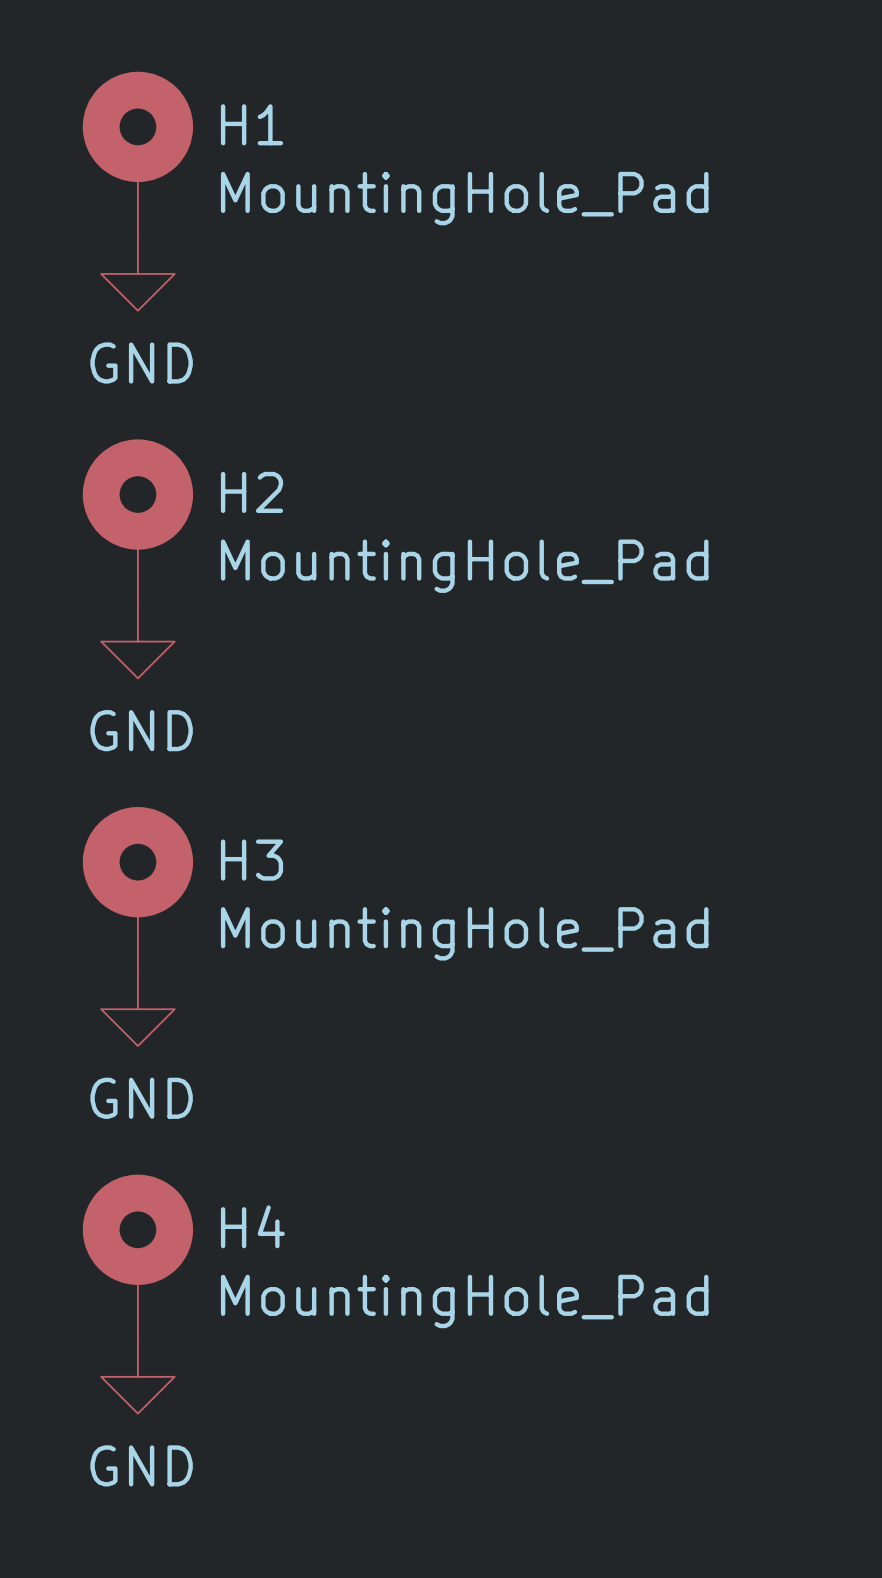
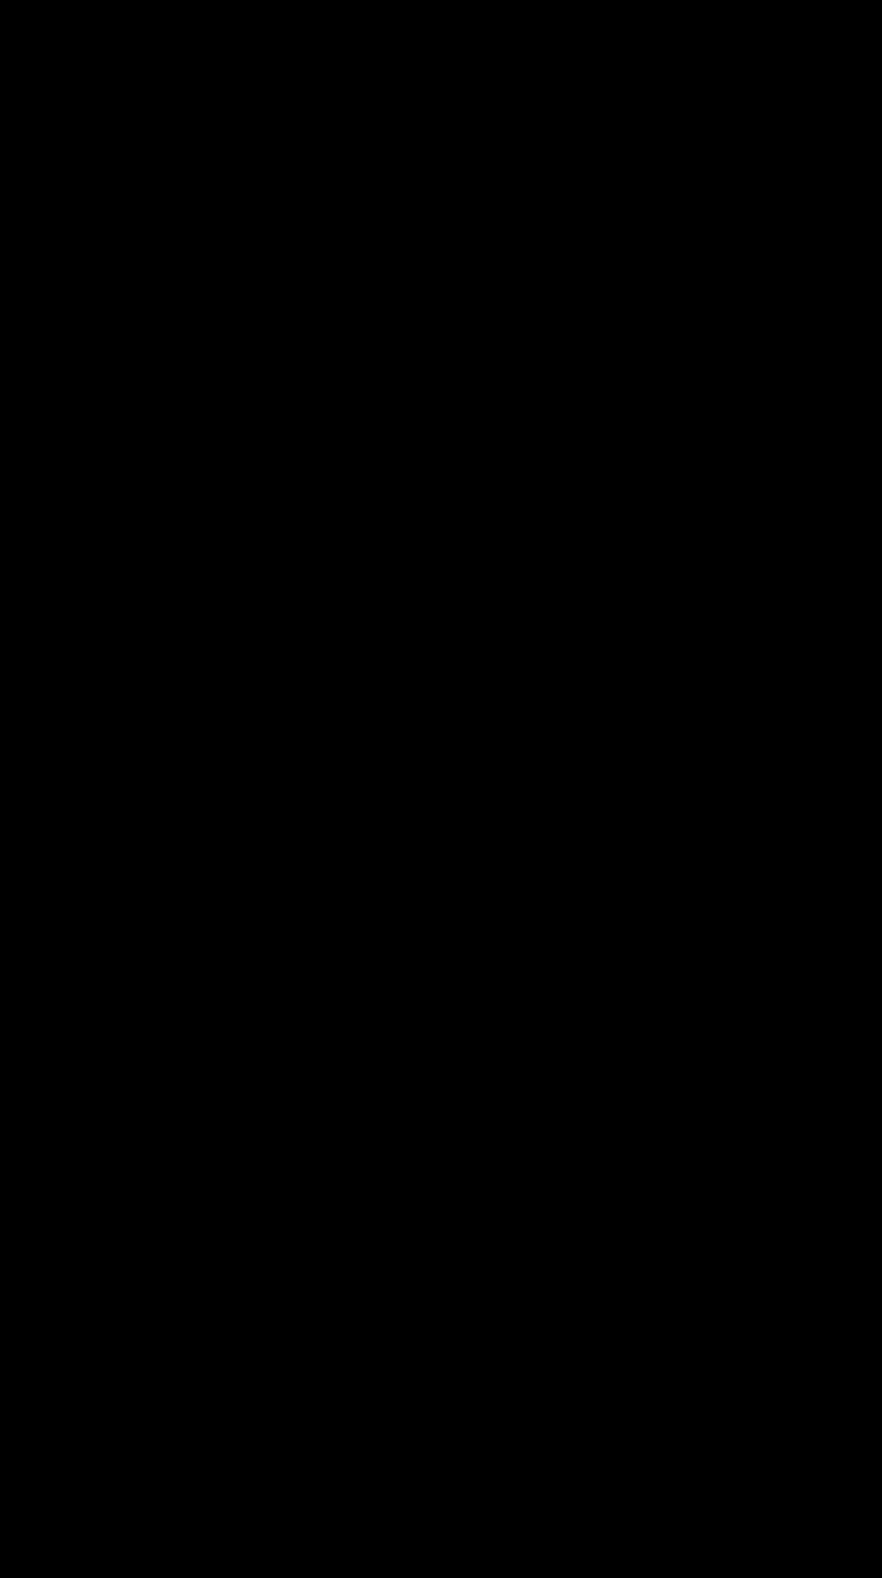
H1: MountingHole_Pad (137, 154) -> none
power symbol: GND (137, 273) -> none
H2: MountingHole_Pad (137, 522) -> none
power symbol: GND (137, 641) -> none
H3: MountingHole_Pad (137, 889) -> none
power symbol: GND (137, 1009) -> none
H4: MountingHole_Pad (137, 1257) -> none
power symbol: GND (137, 1376) -> none

